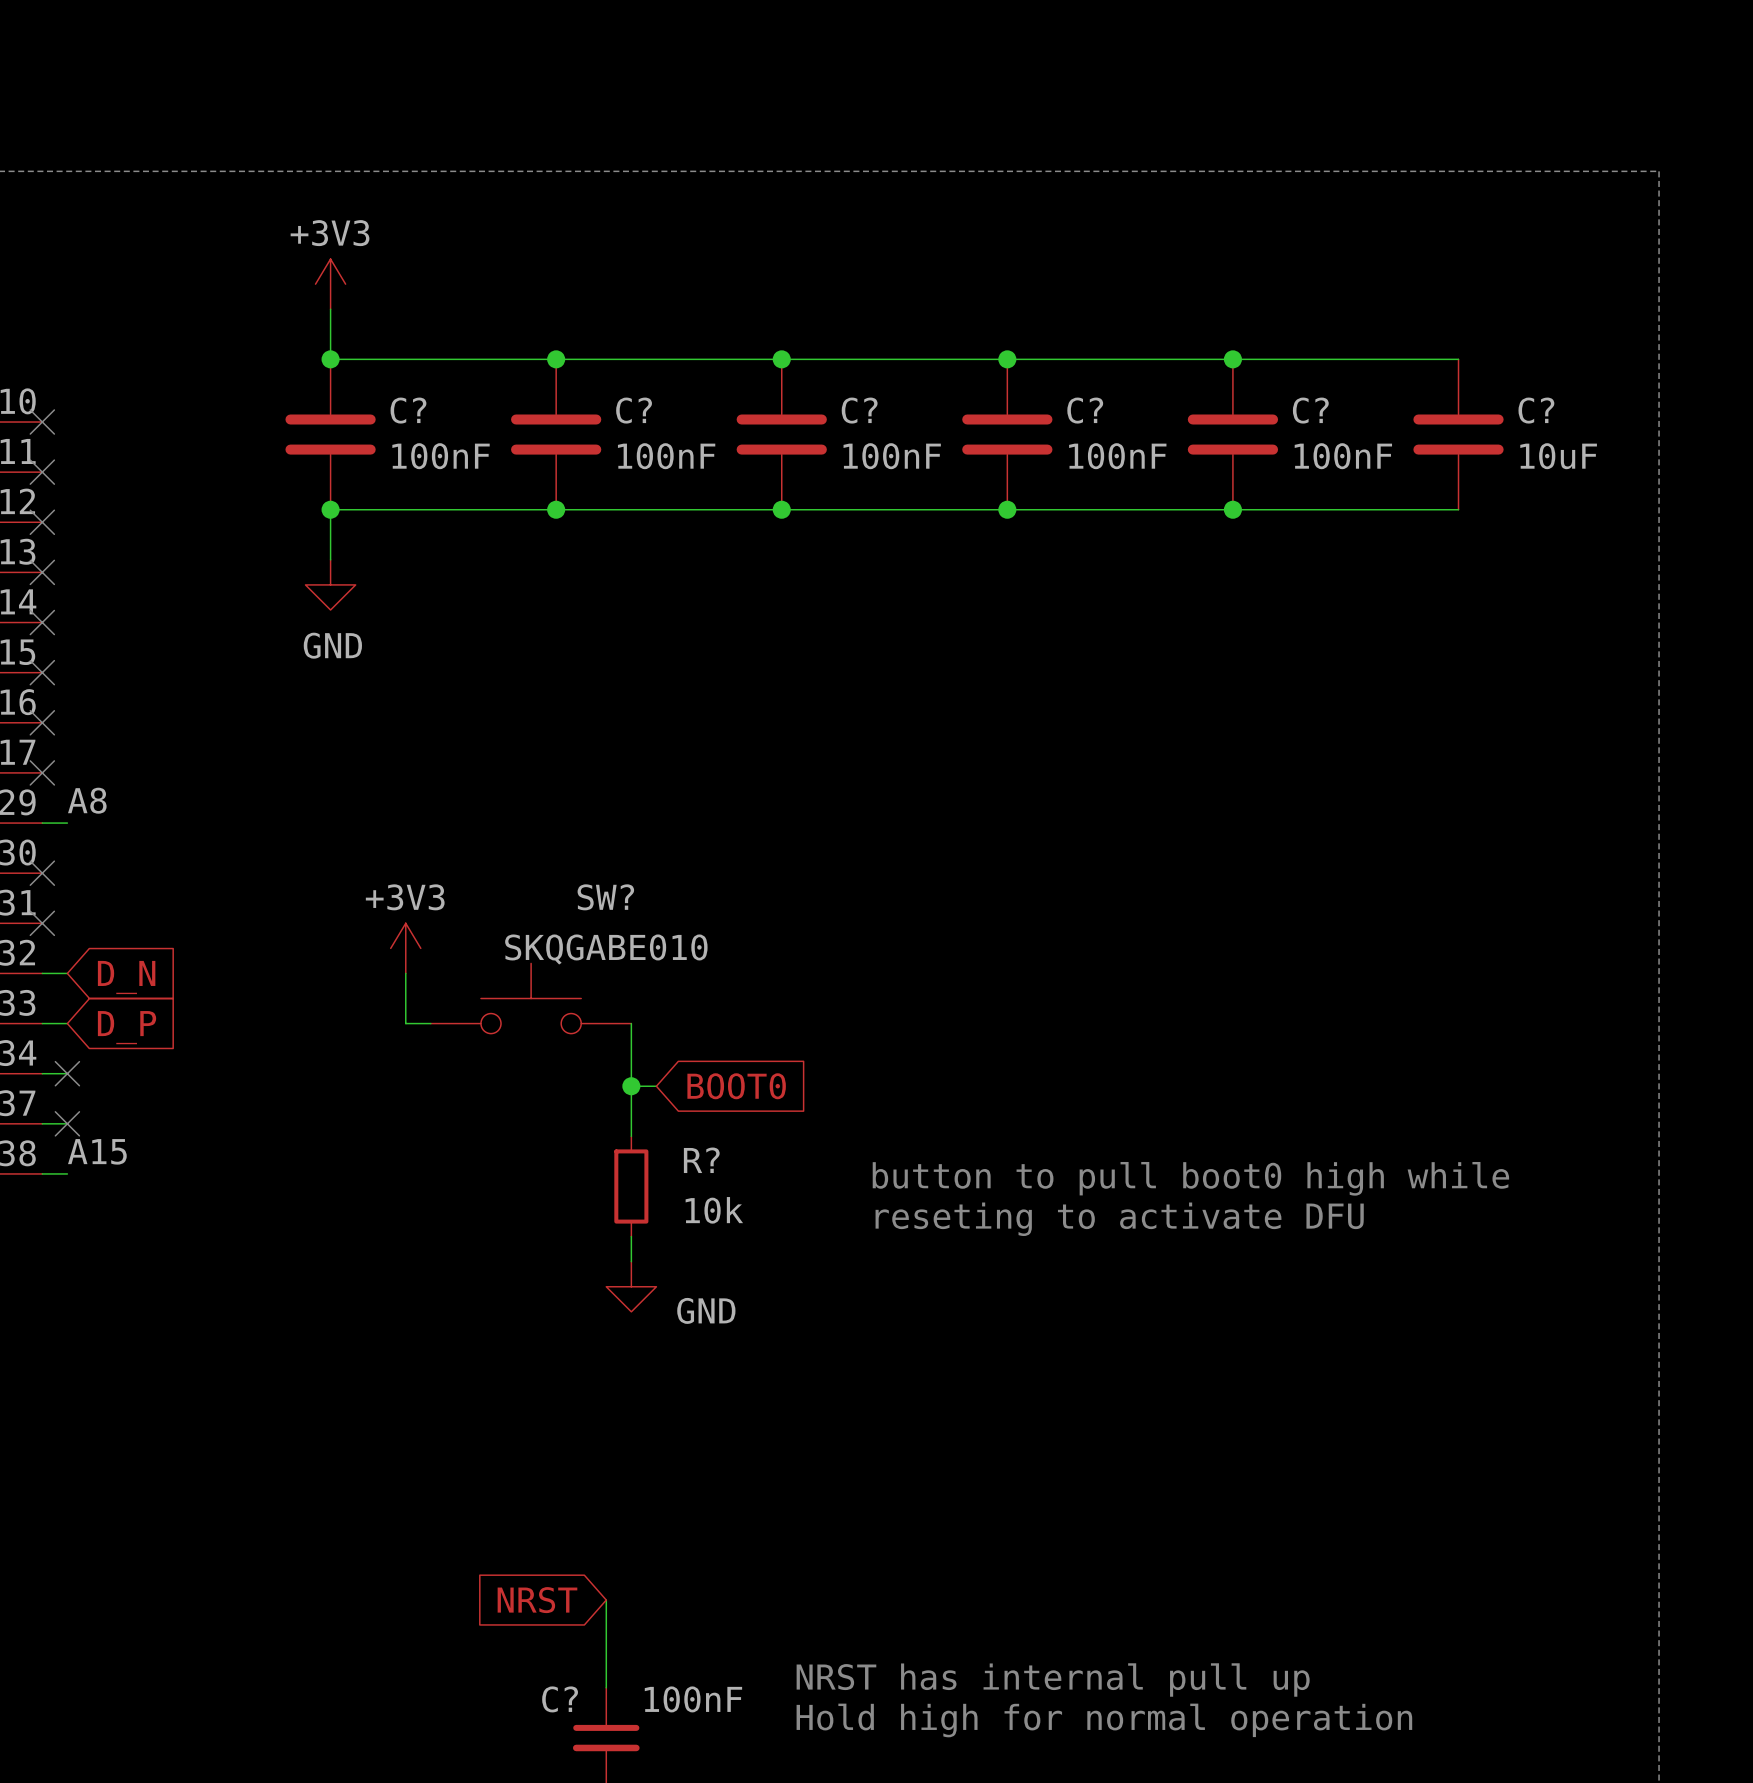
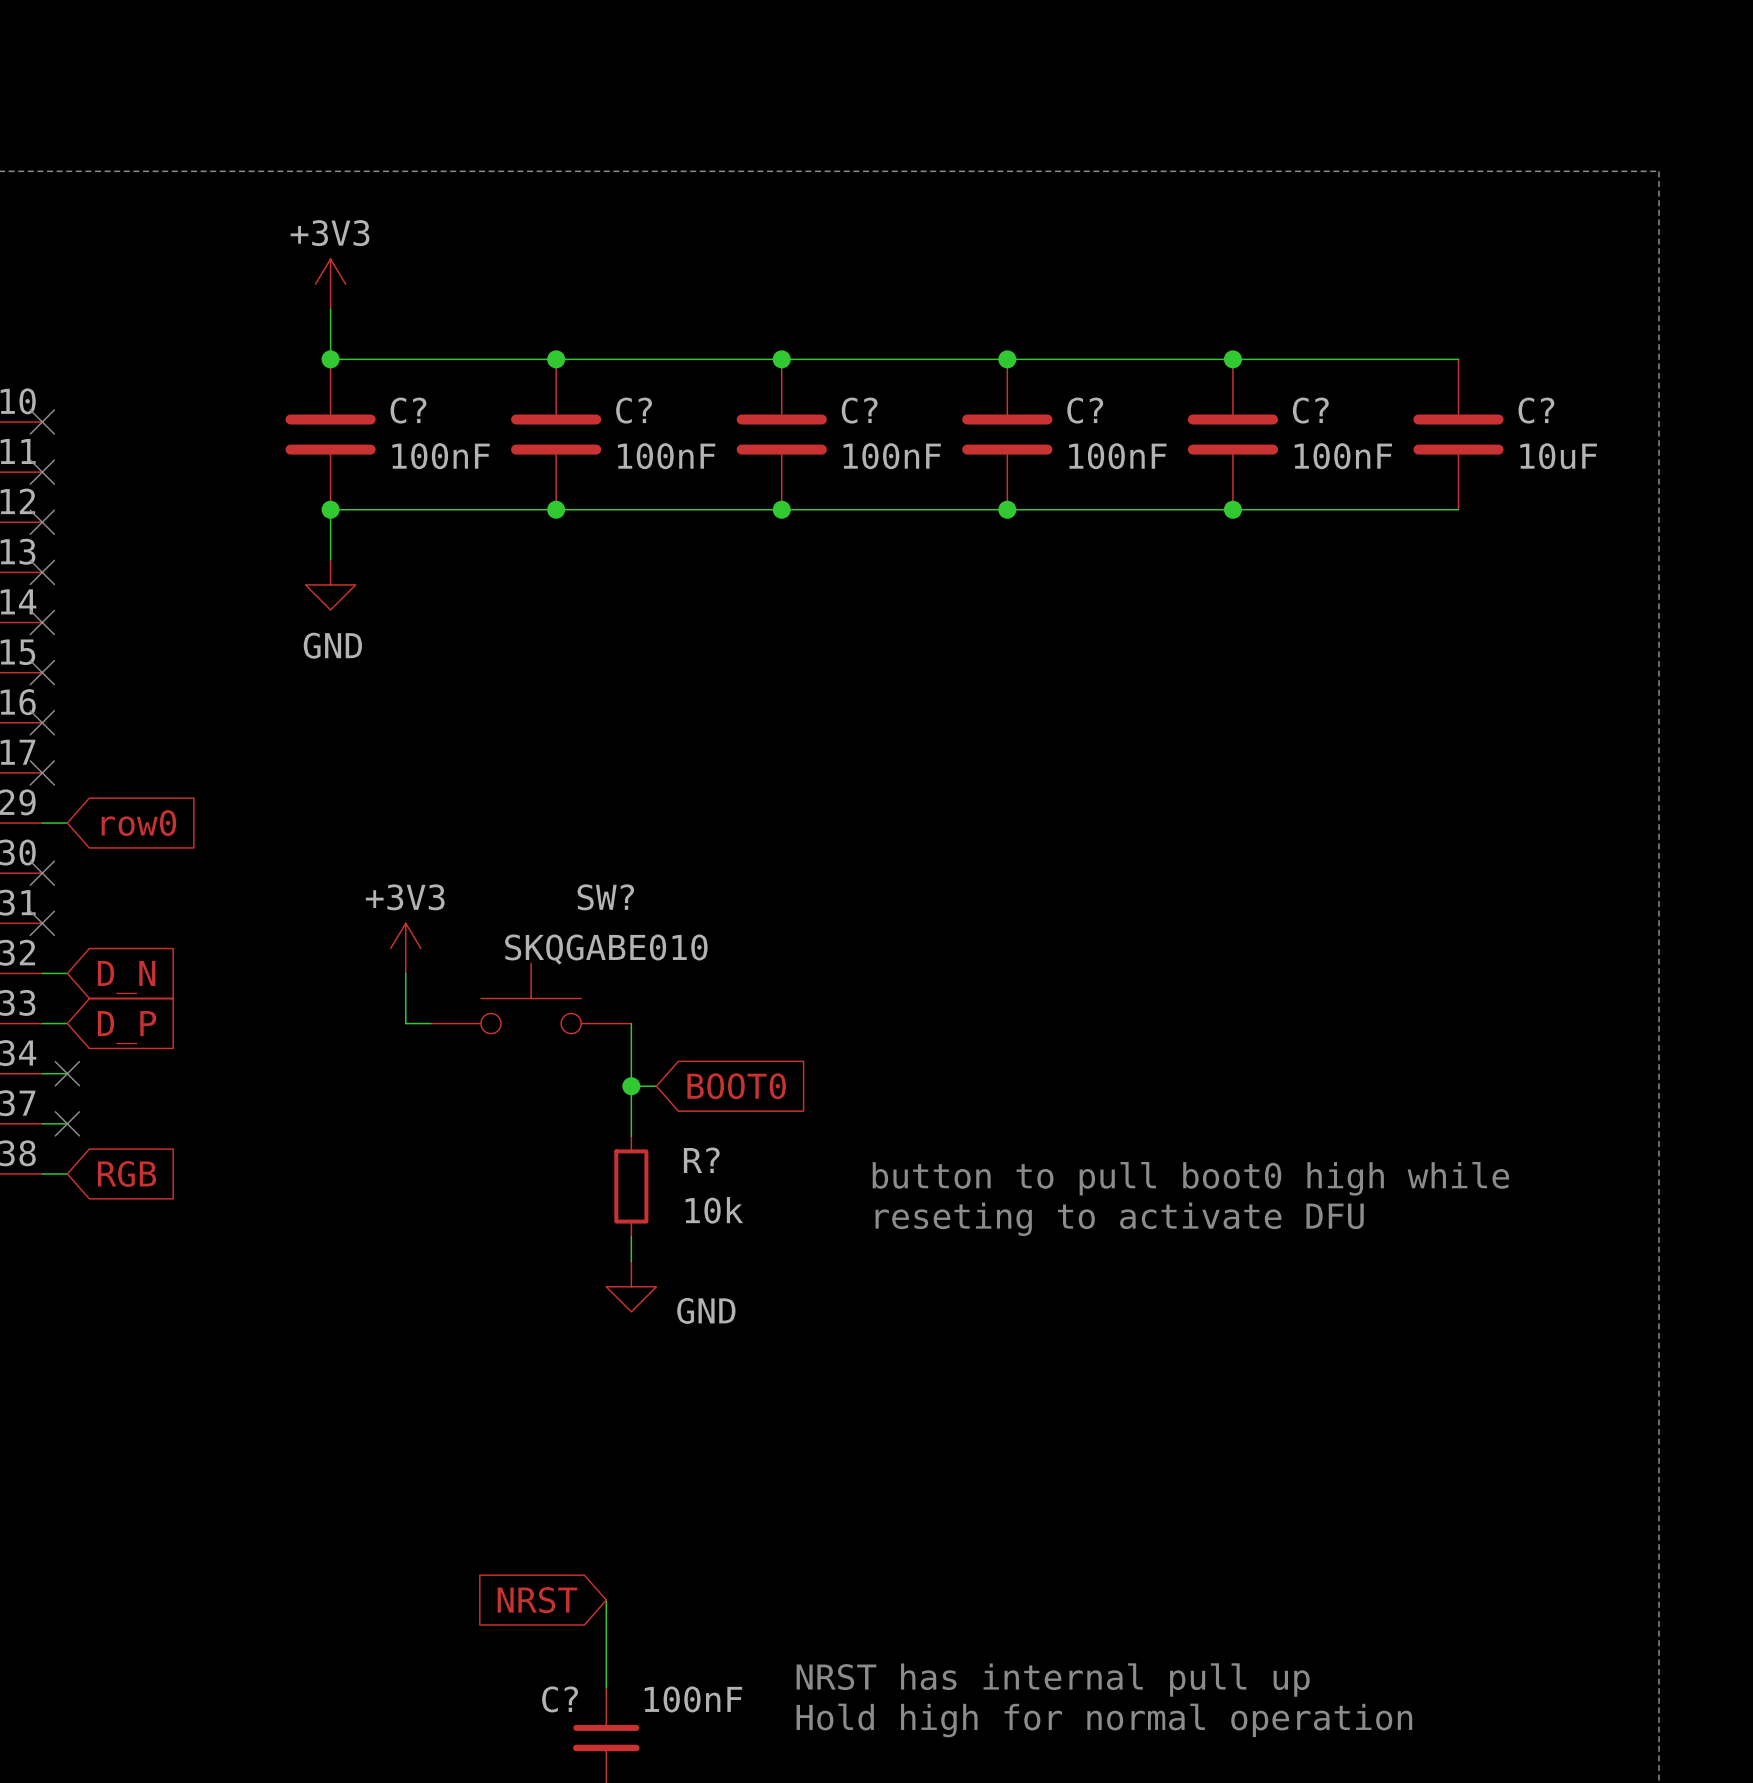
label: A8 (87, 800) -> none
global label: none -> row0 (138, 823)
label: A15 (97, 1151) -> none
global label: none -> RGB (127, 1173)

